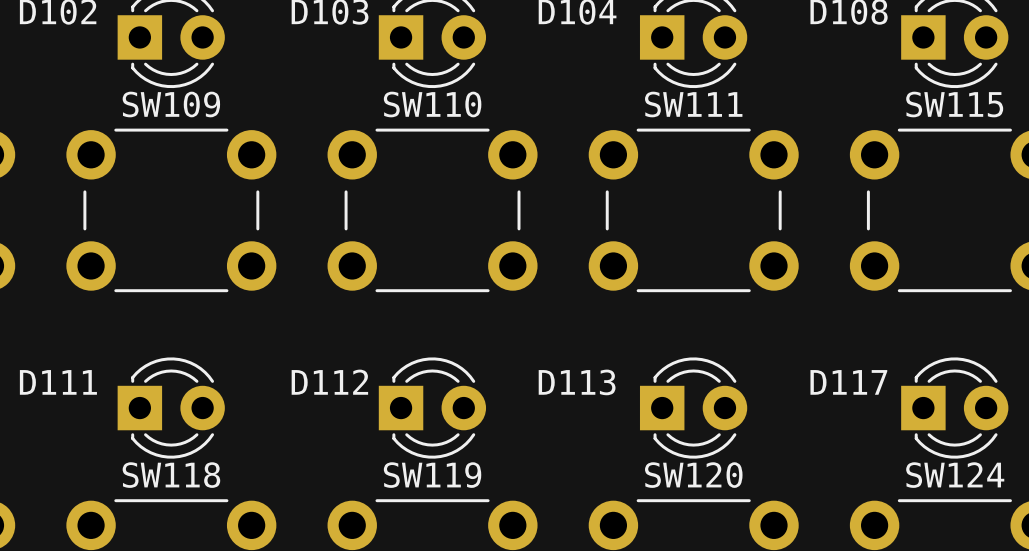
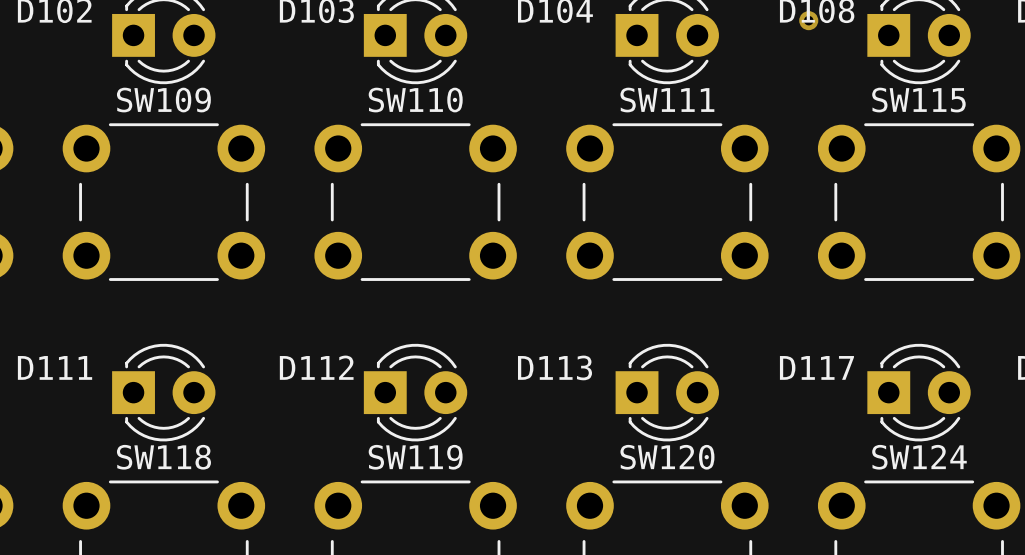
via: none -> (808, 20)

